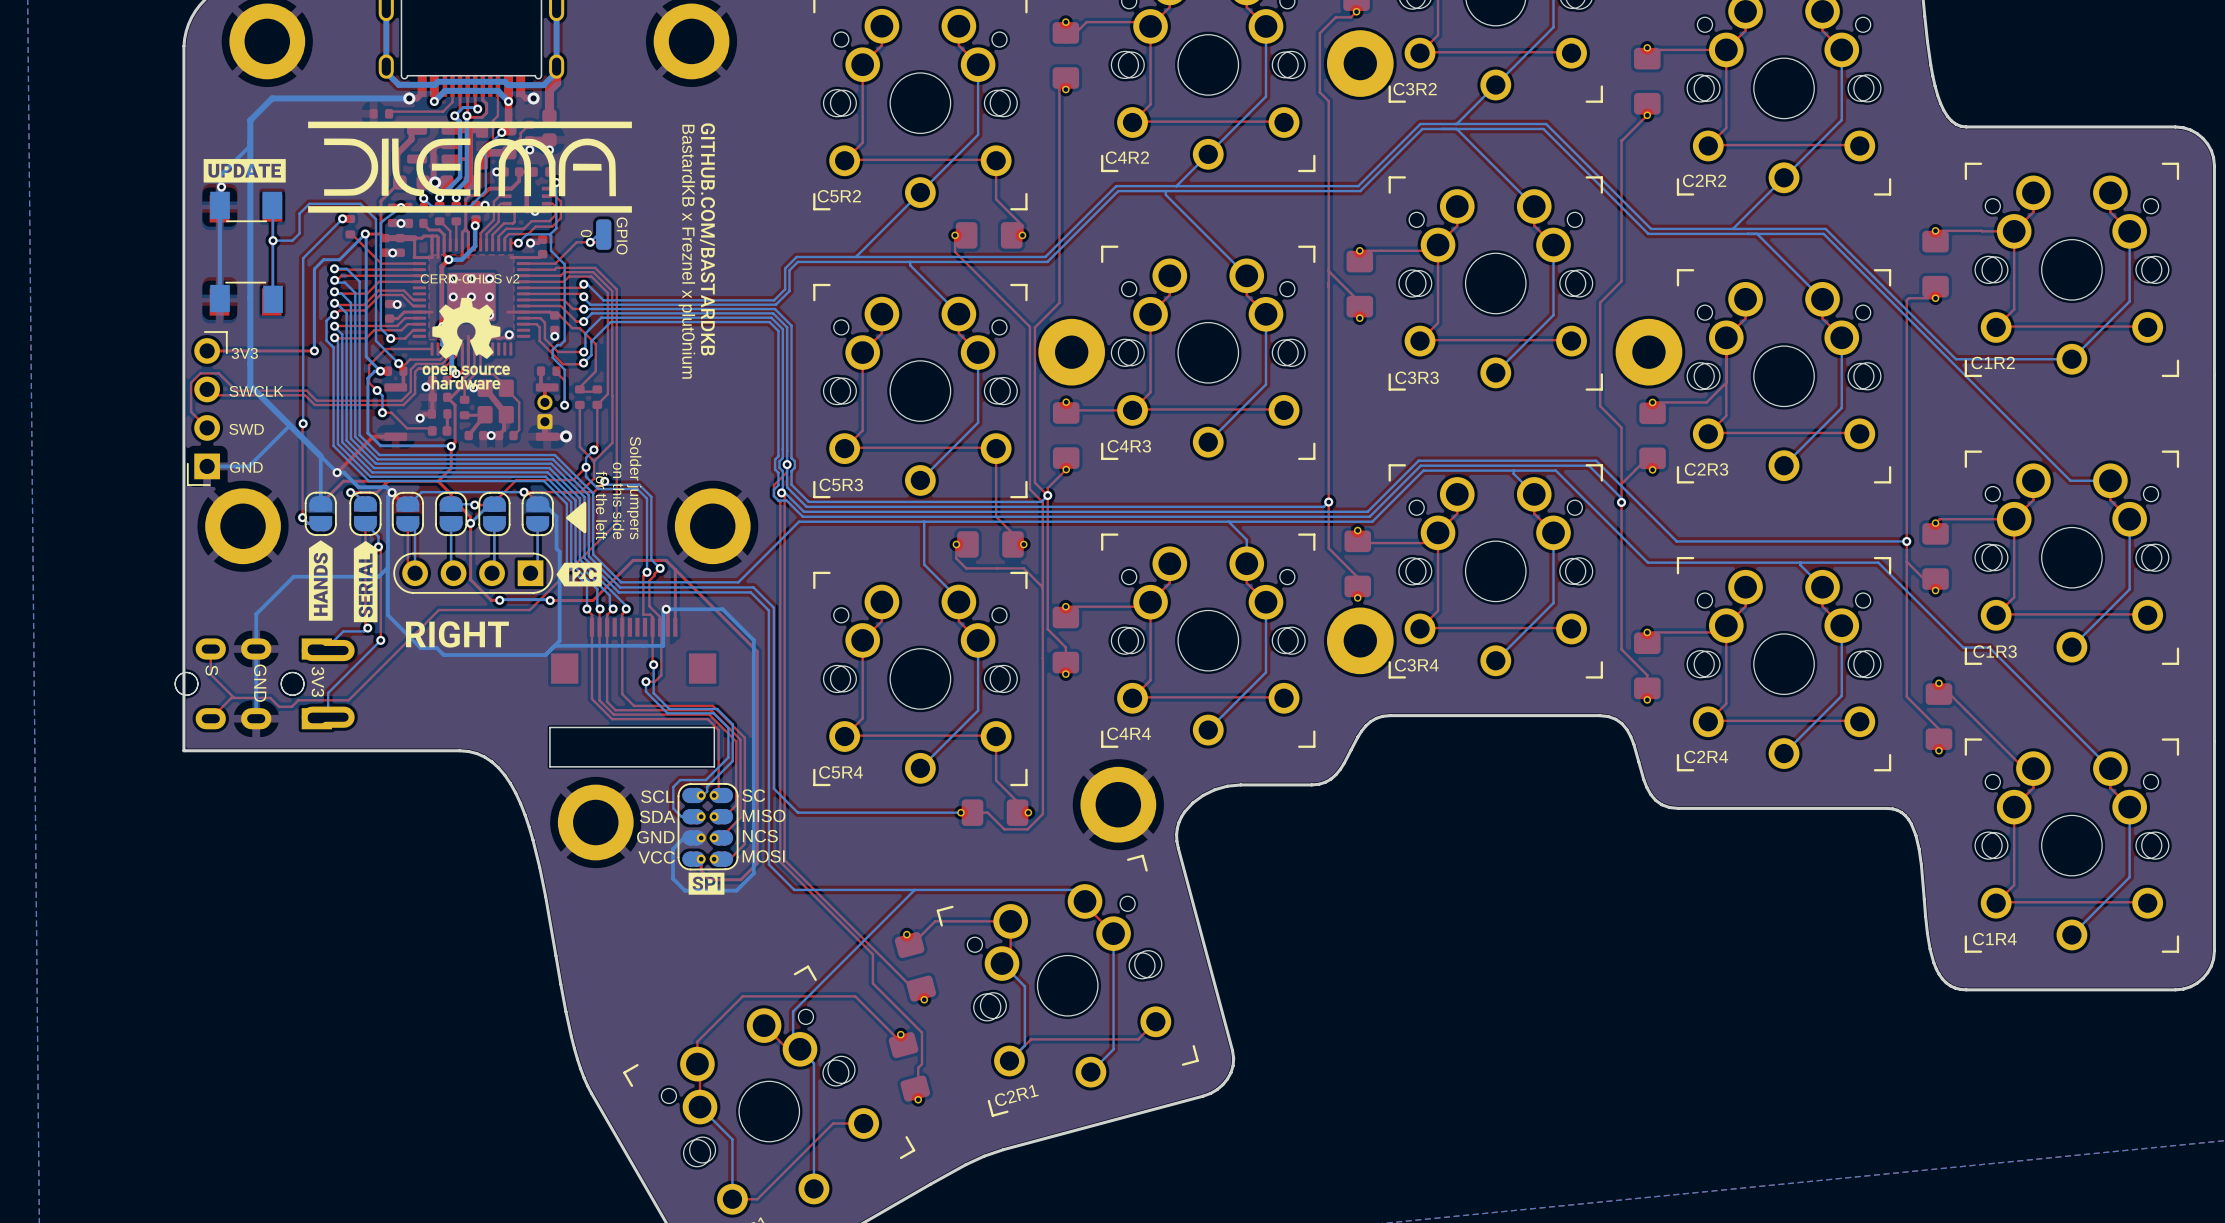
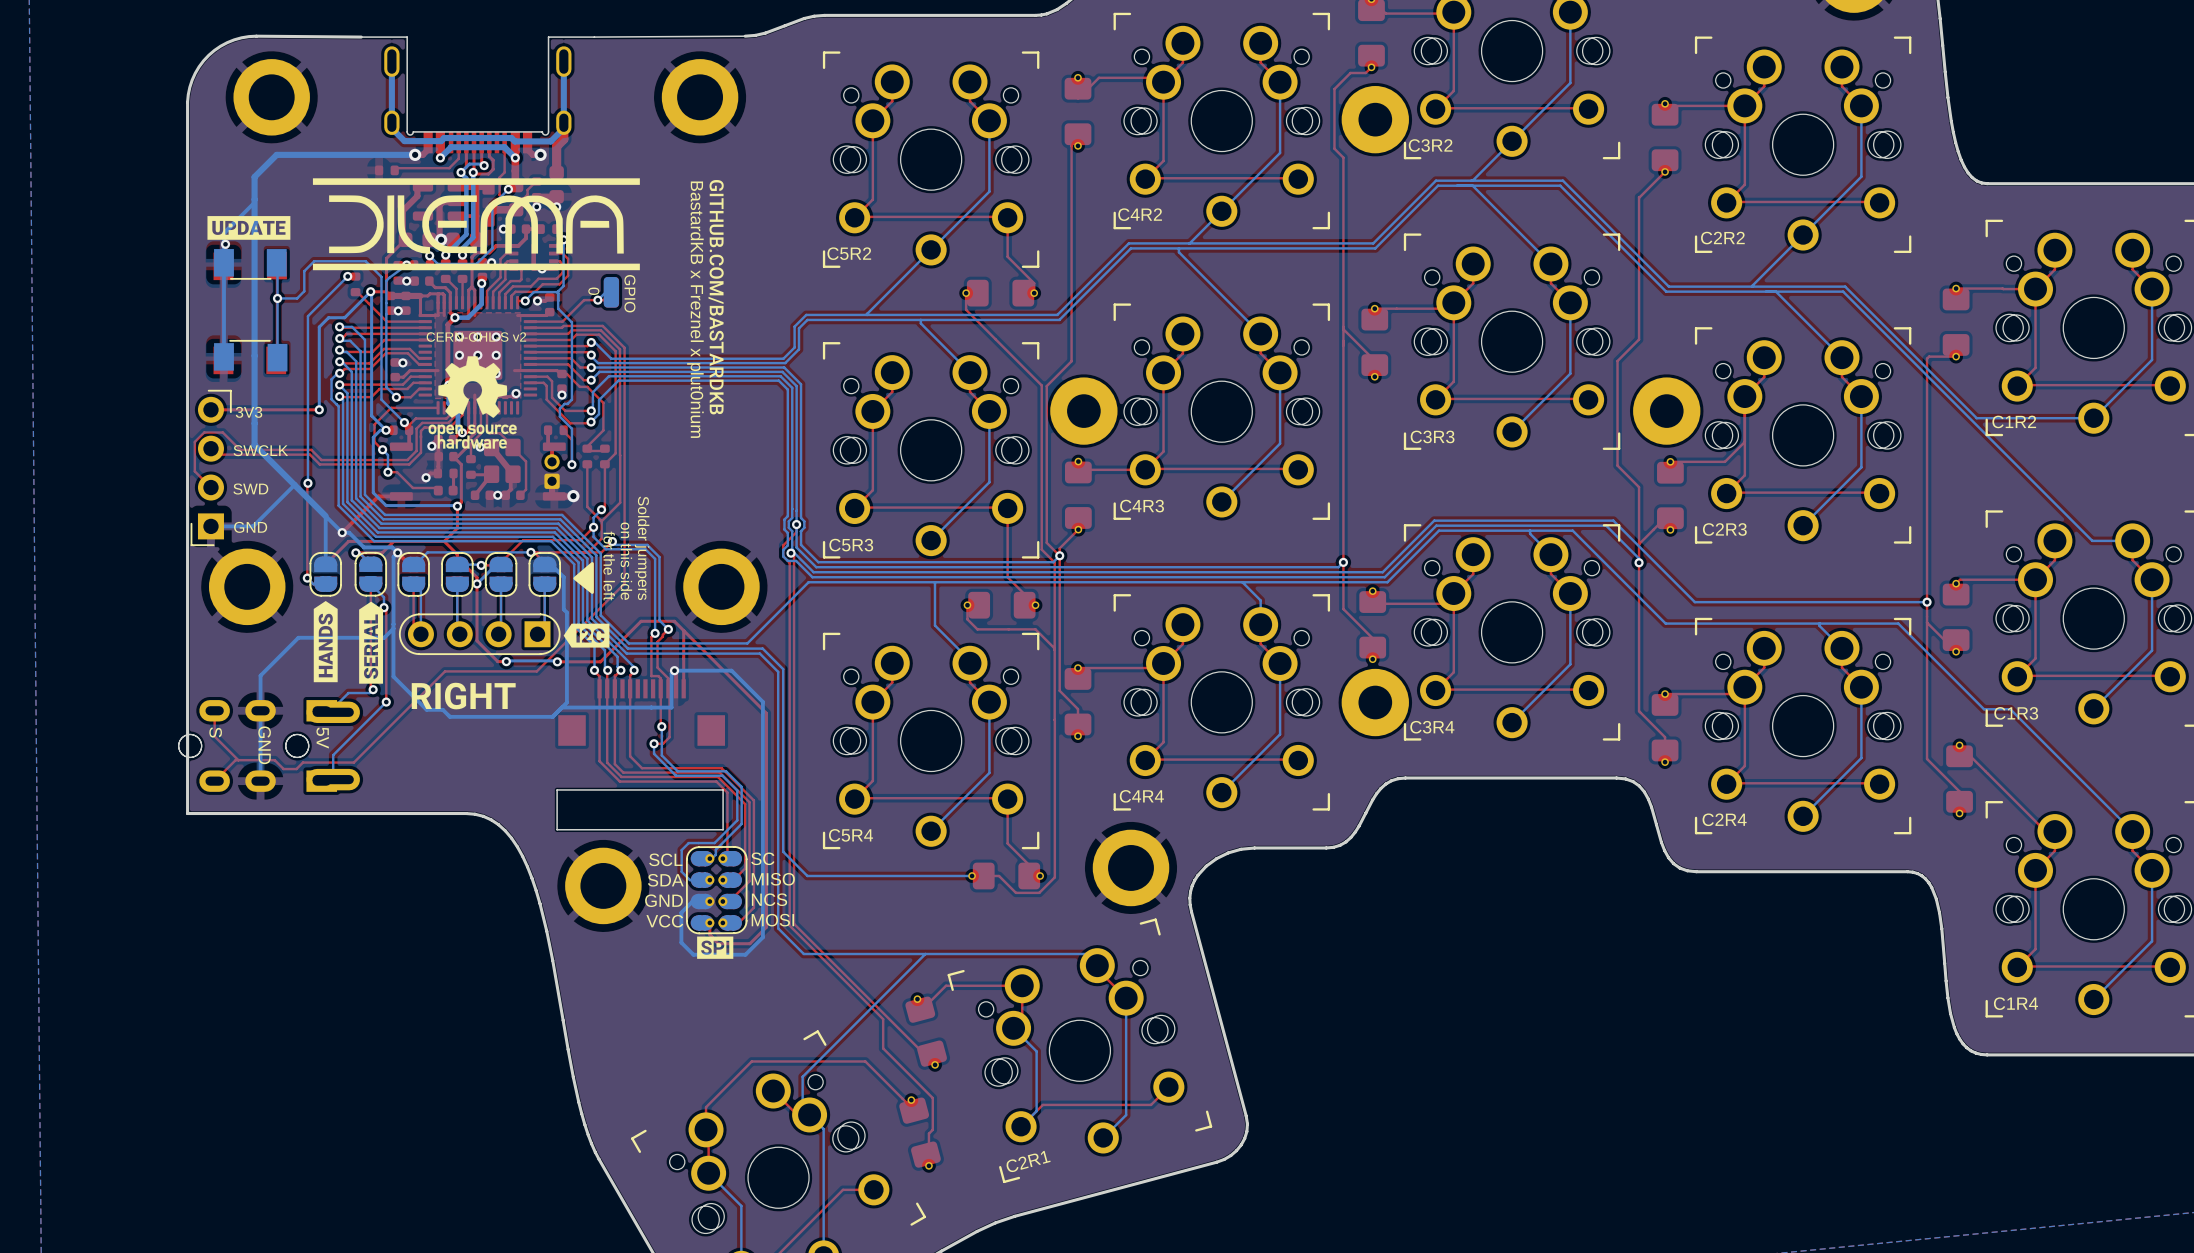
text: 3V3 (317, 681) -> 5V (322, 738)

